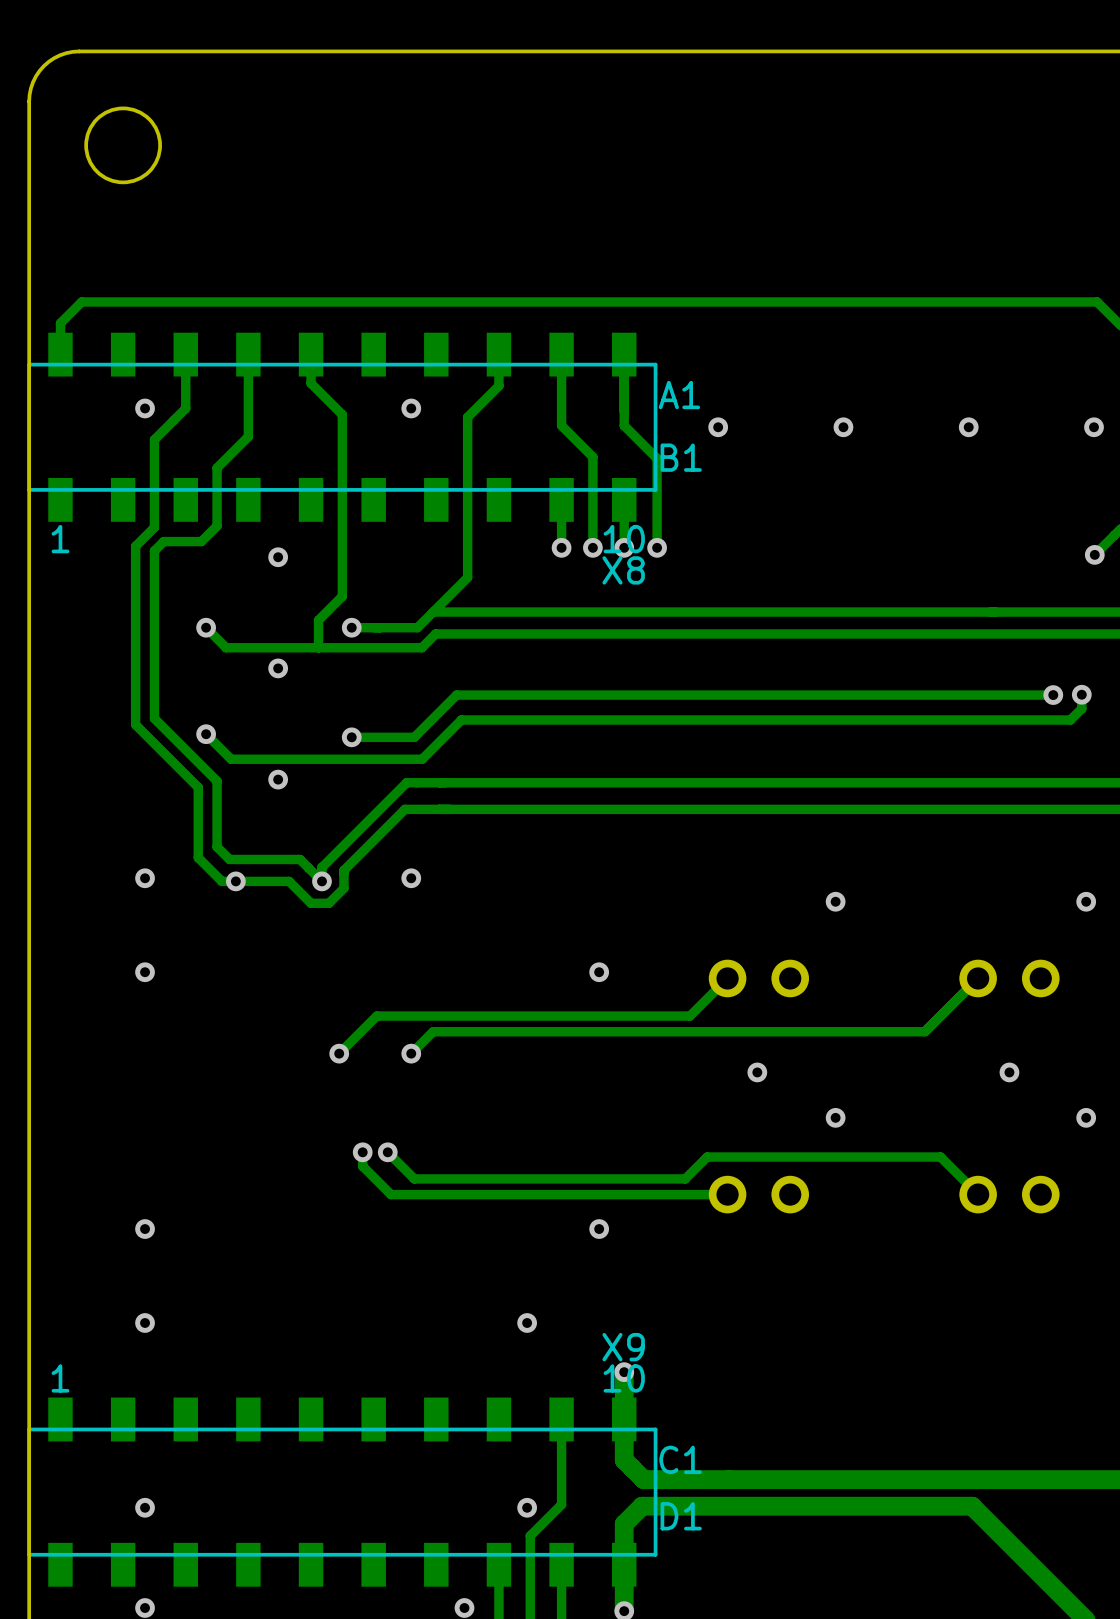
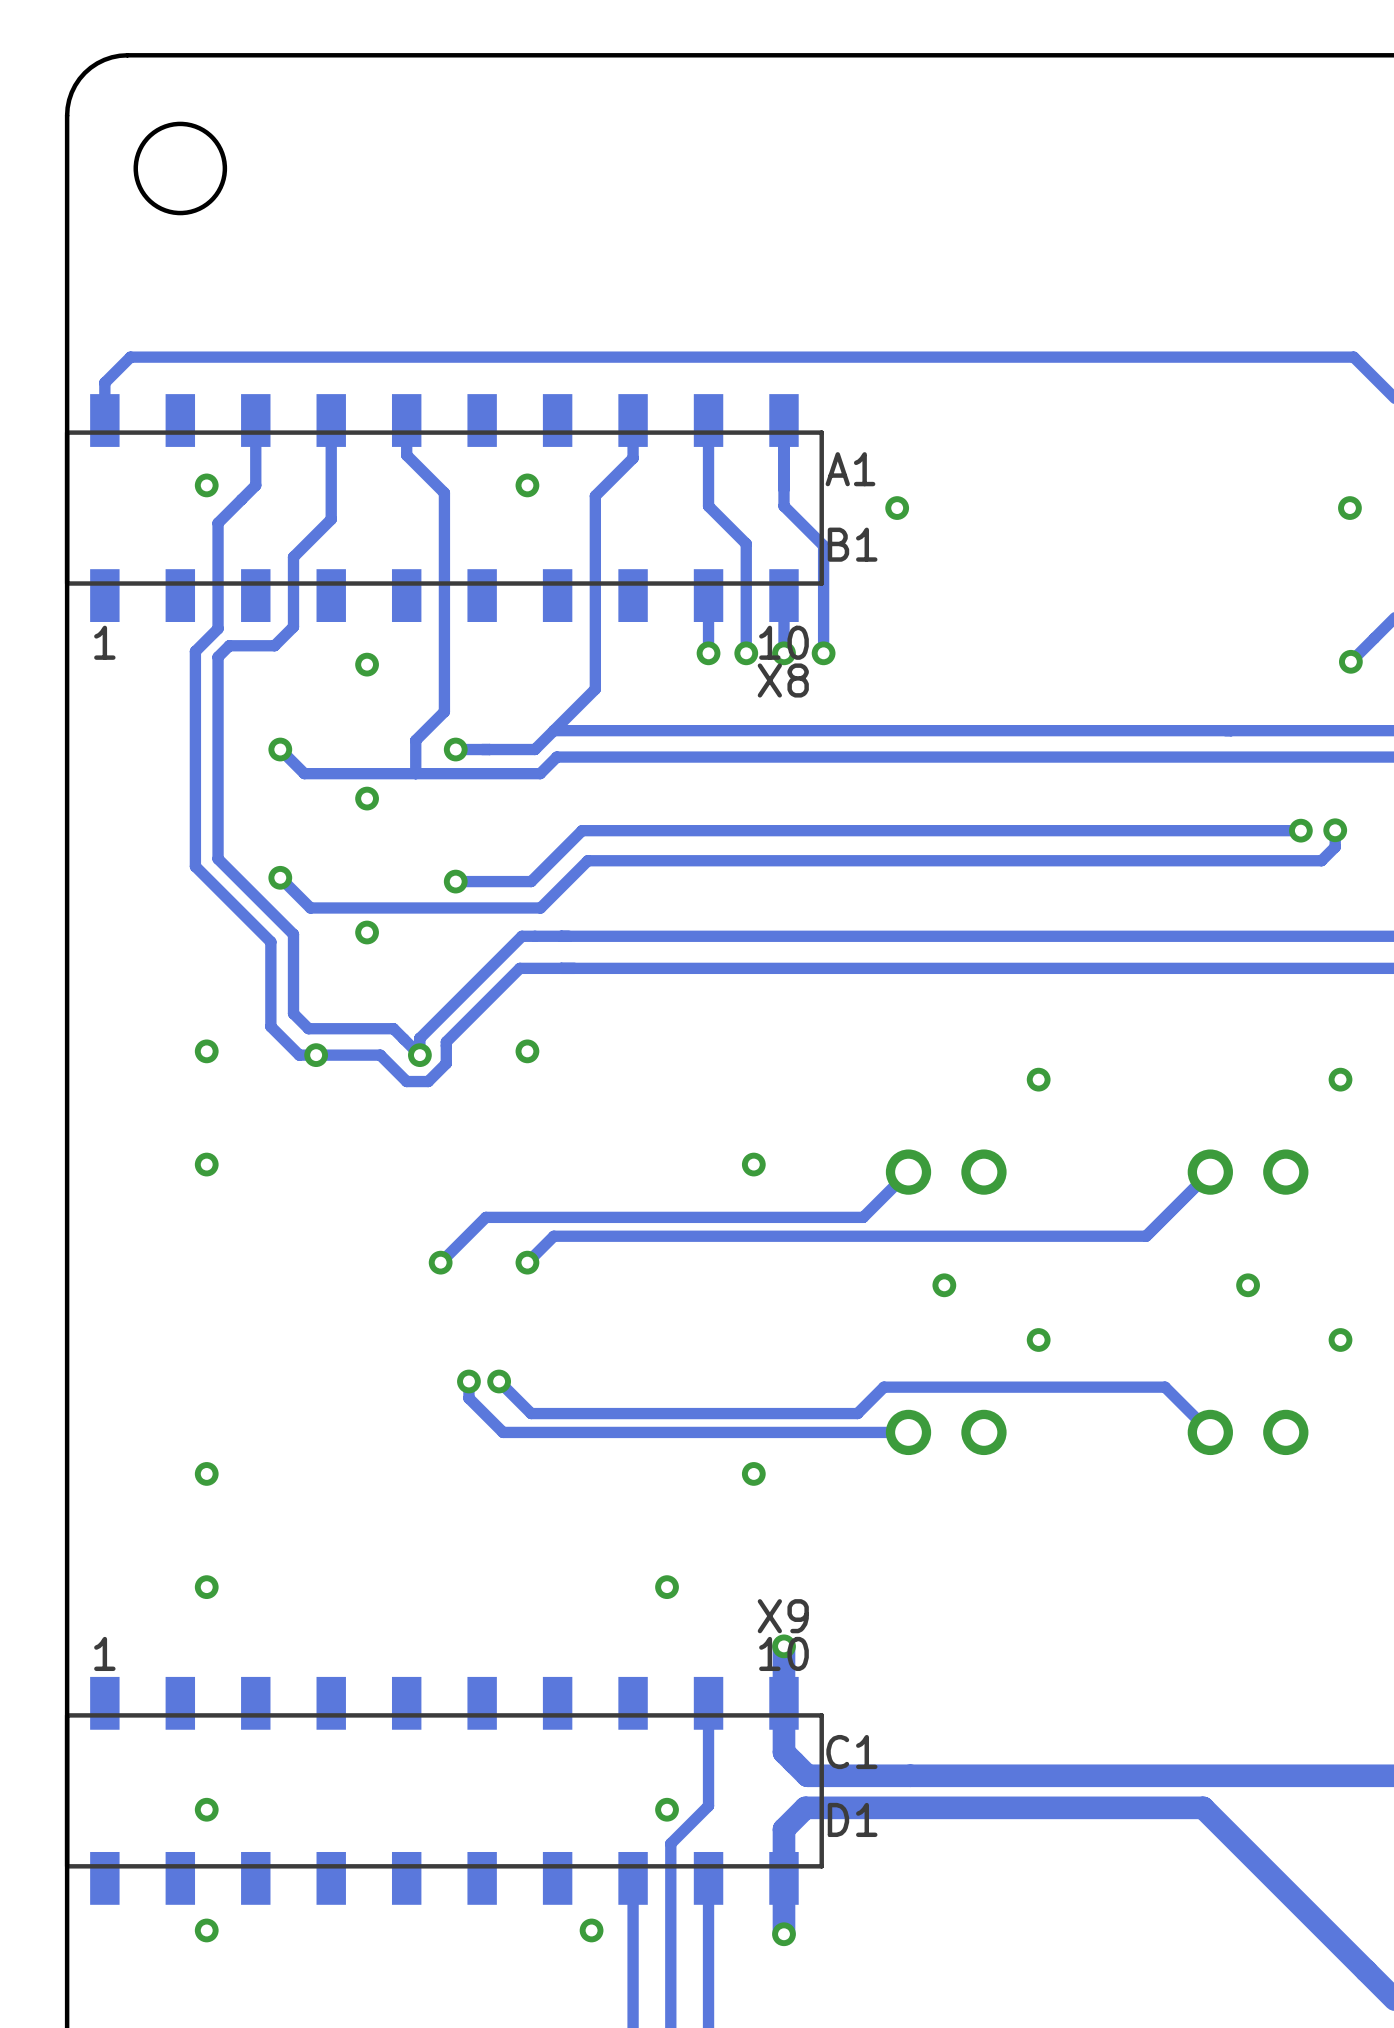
via: (843, 427) -> none
via: (968, 427) -> none

